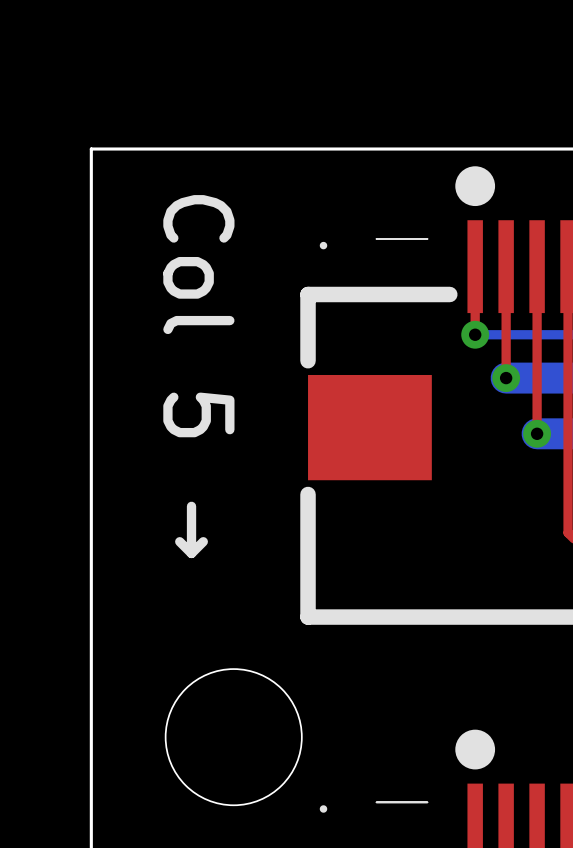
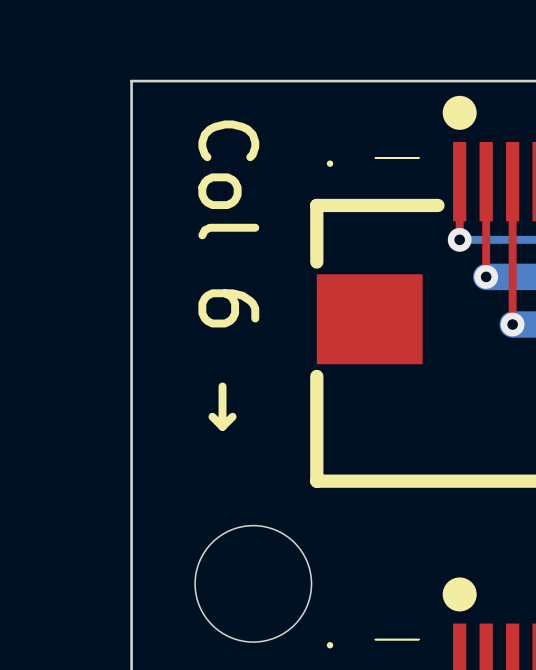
text: Col 5 → (198, 376) -> Col 6 → (228, 275)

